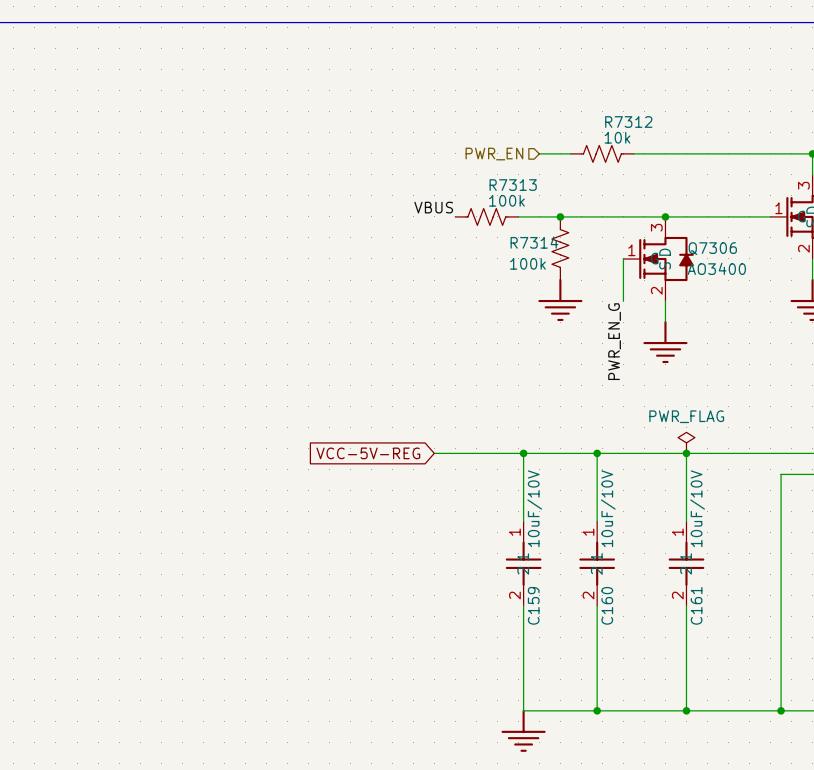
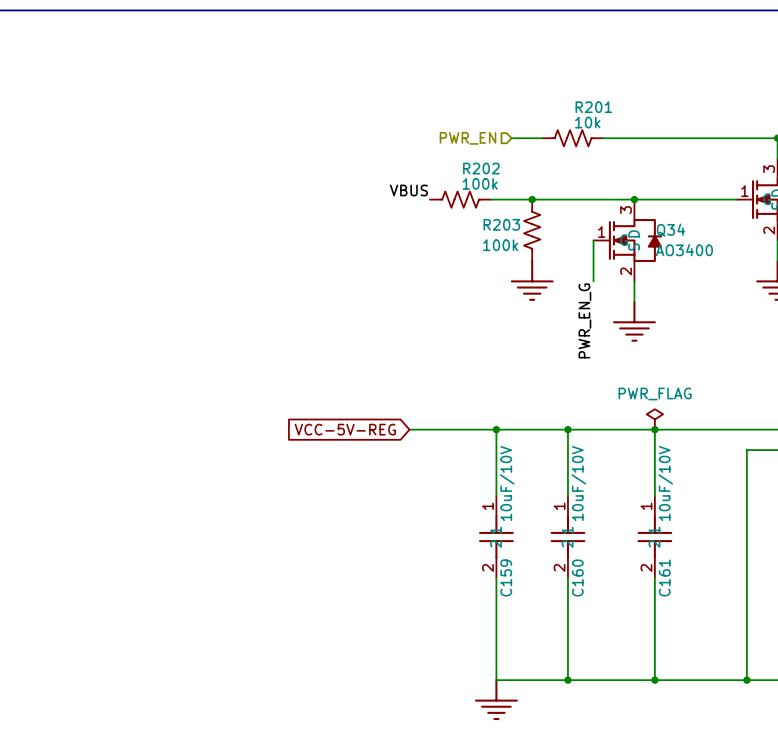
R7312 name: R7312 (628, 122) -> R201 (593, 107)
R7313 name: R7313 (513, 185) -> R202 (481, 168)
R7314 name: R7314 (534, 242) -> R203 (501, 224)
Q7306 name: Q7306 (712, 248) -> Q34 (671, 230)

